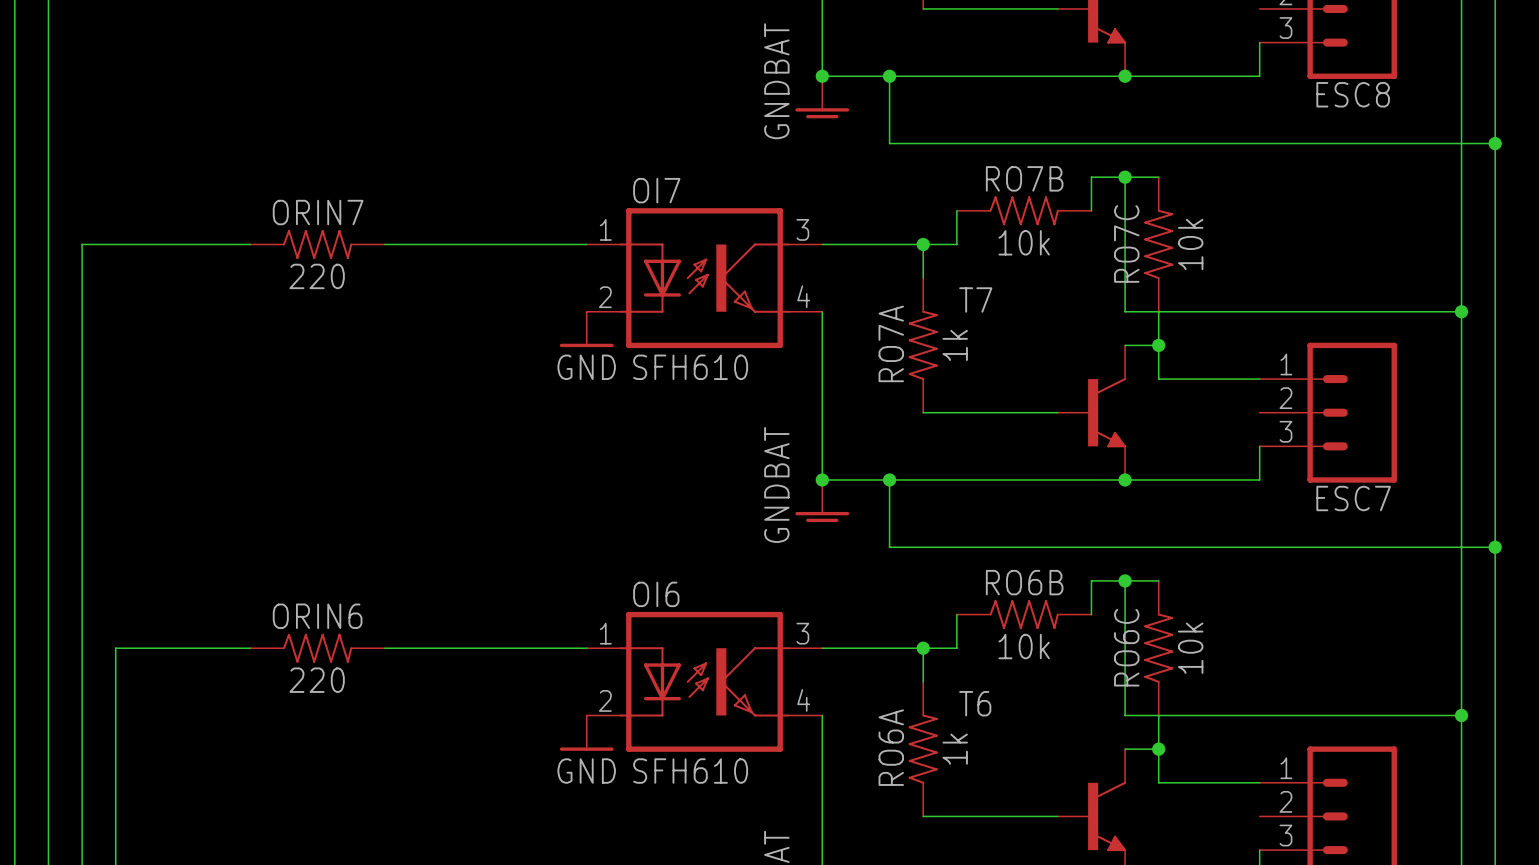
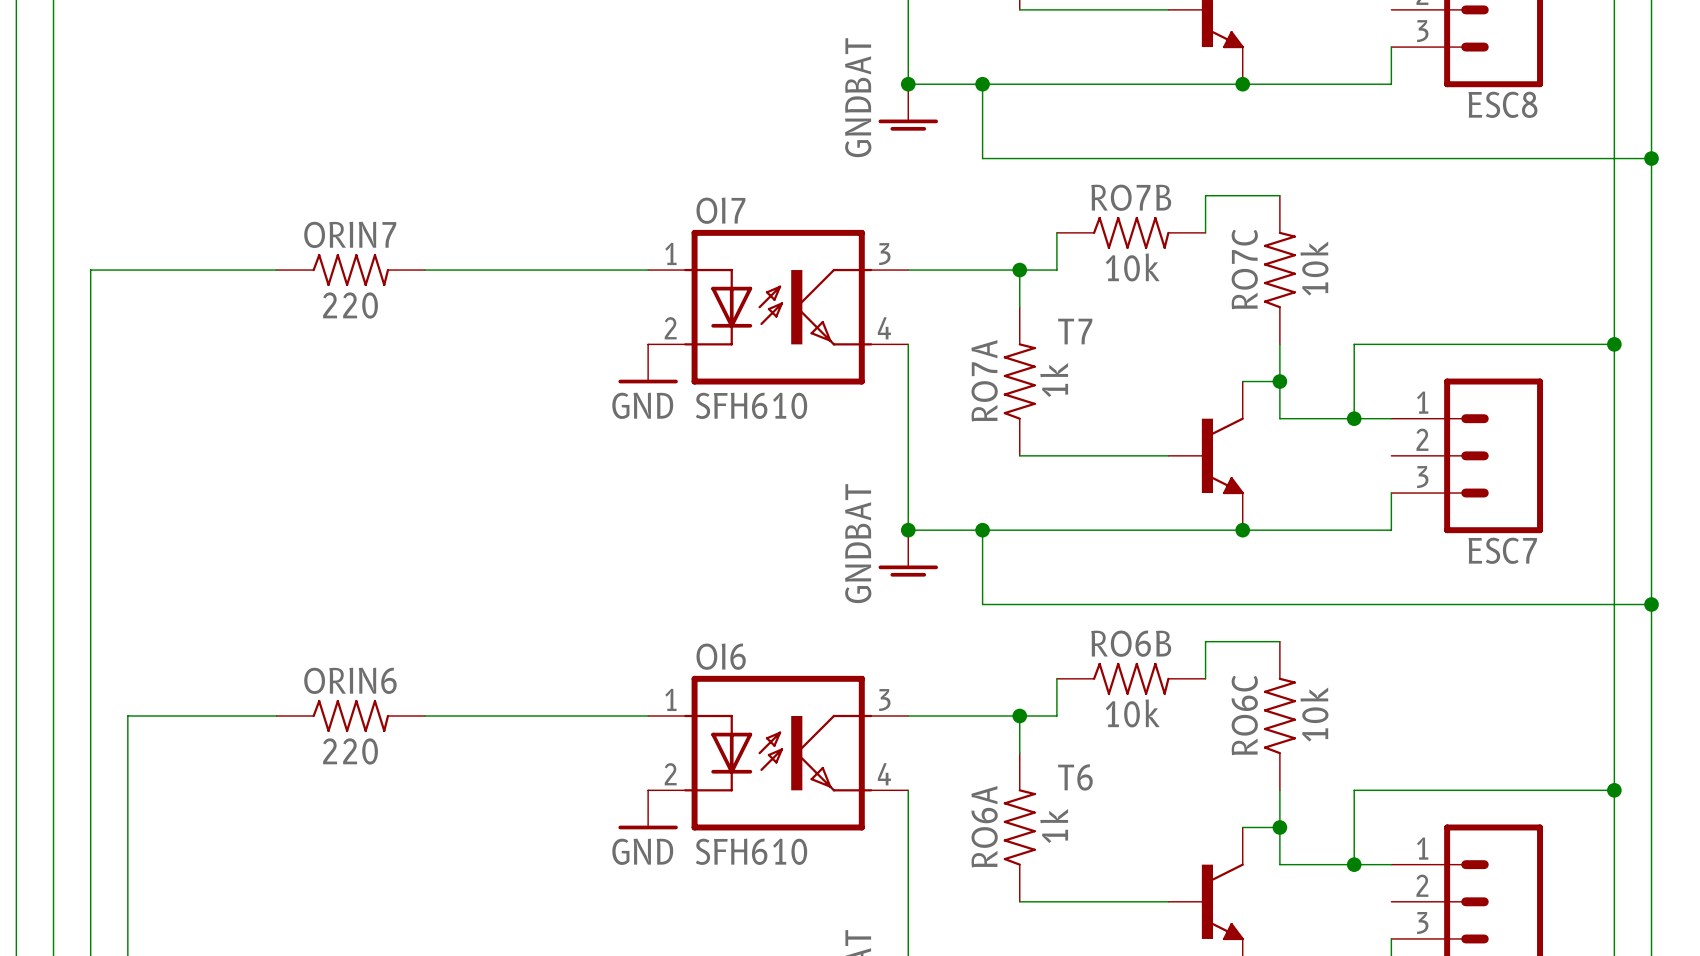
wire: (1125, 177) (1125, 311) (1226, 311) -> (1354, 418) (1354, 344)
junction: (1125, 177) -> none
junction: none -> (1354, 418)
wire: (1125, 580) (1125, 715) (1226, 715) -> (1354, 864) (1354, 790)
junction: (1125, 580) -> none
junction: none -> (1354, 864)

